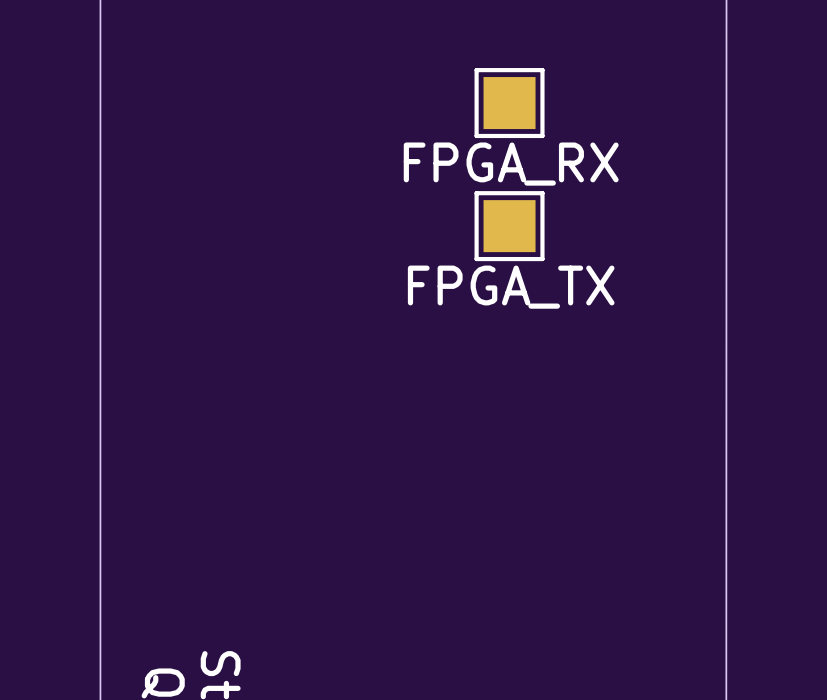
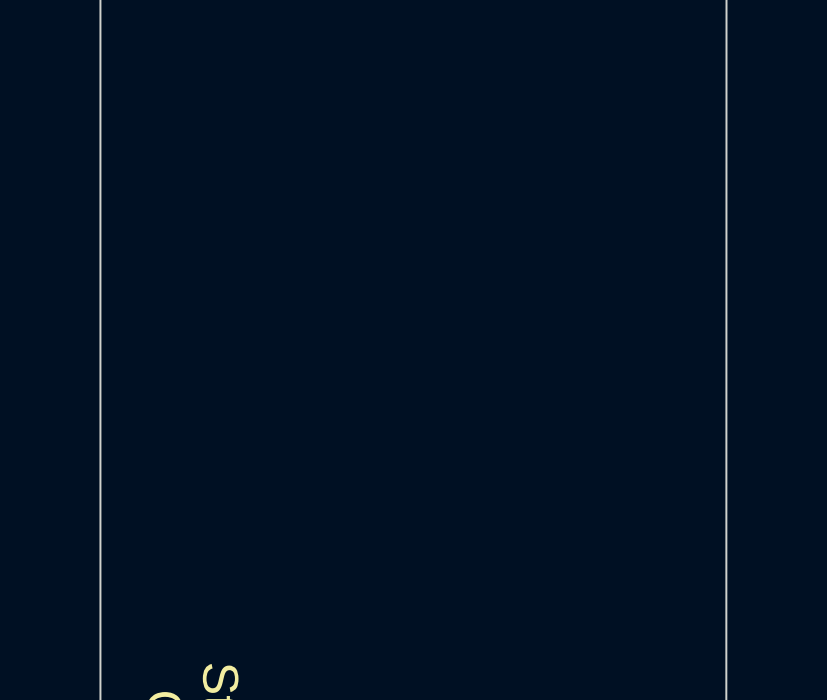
part: FPGA_RX (509, 103) -> none
part: FPGA_TX (509, 226) -> none

